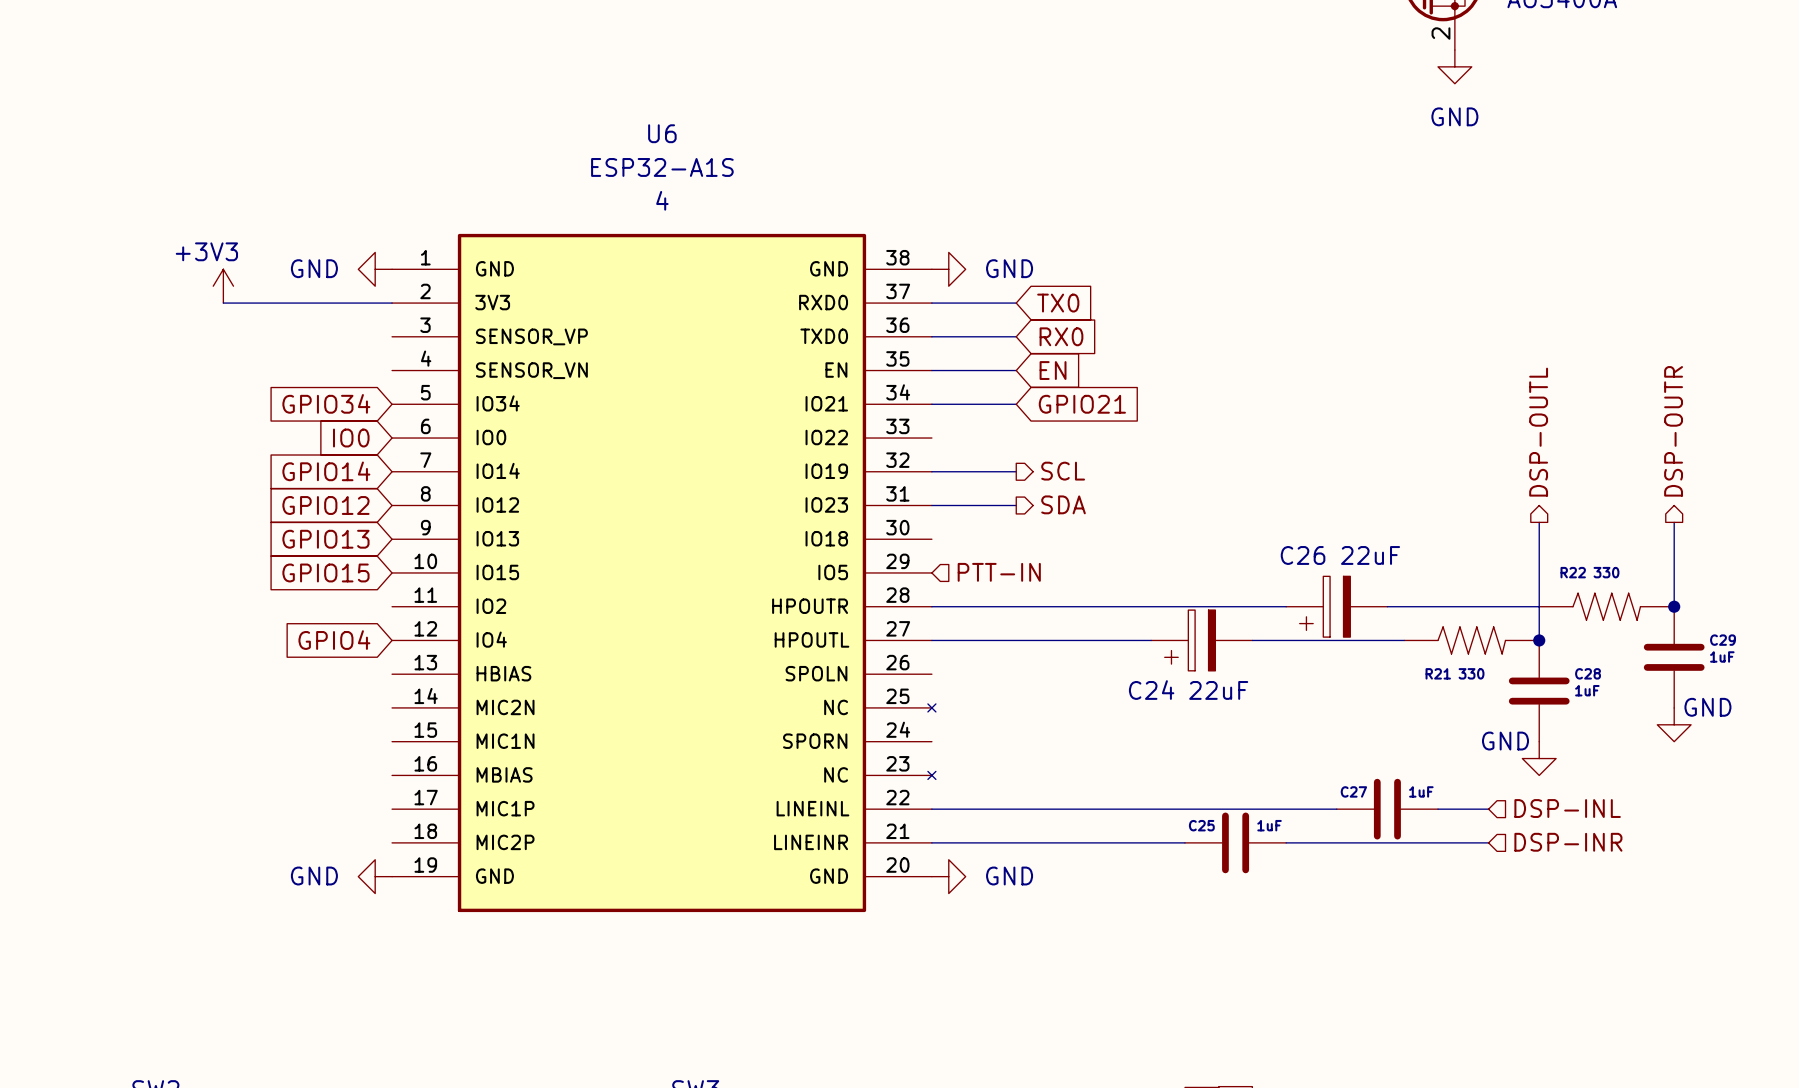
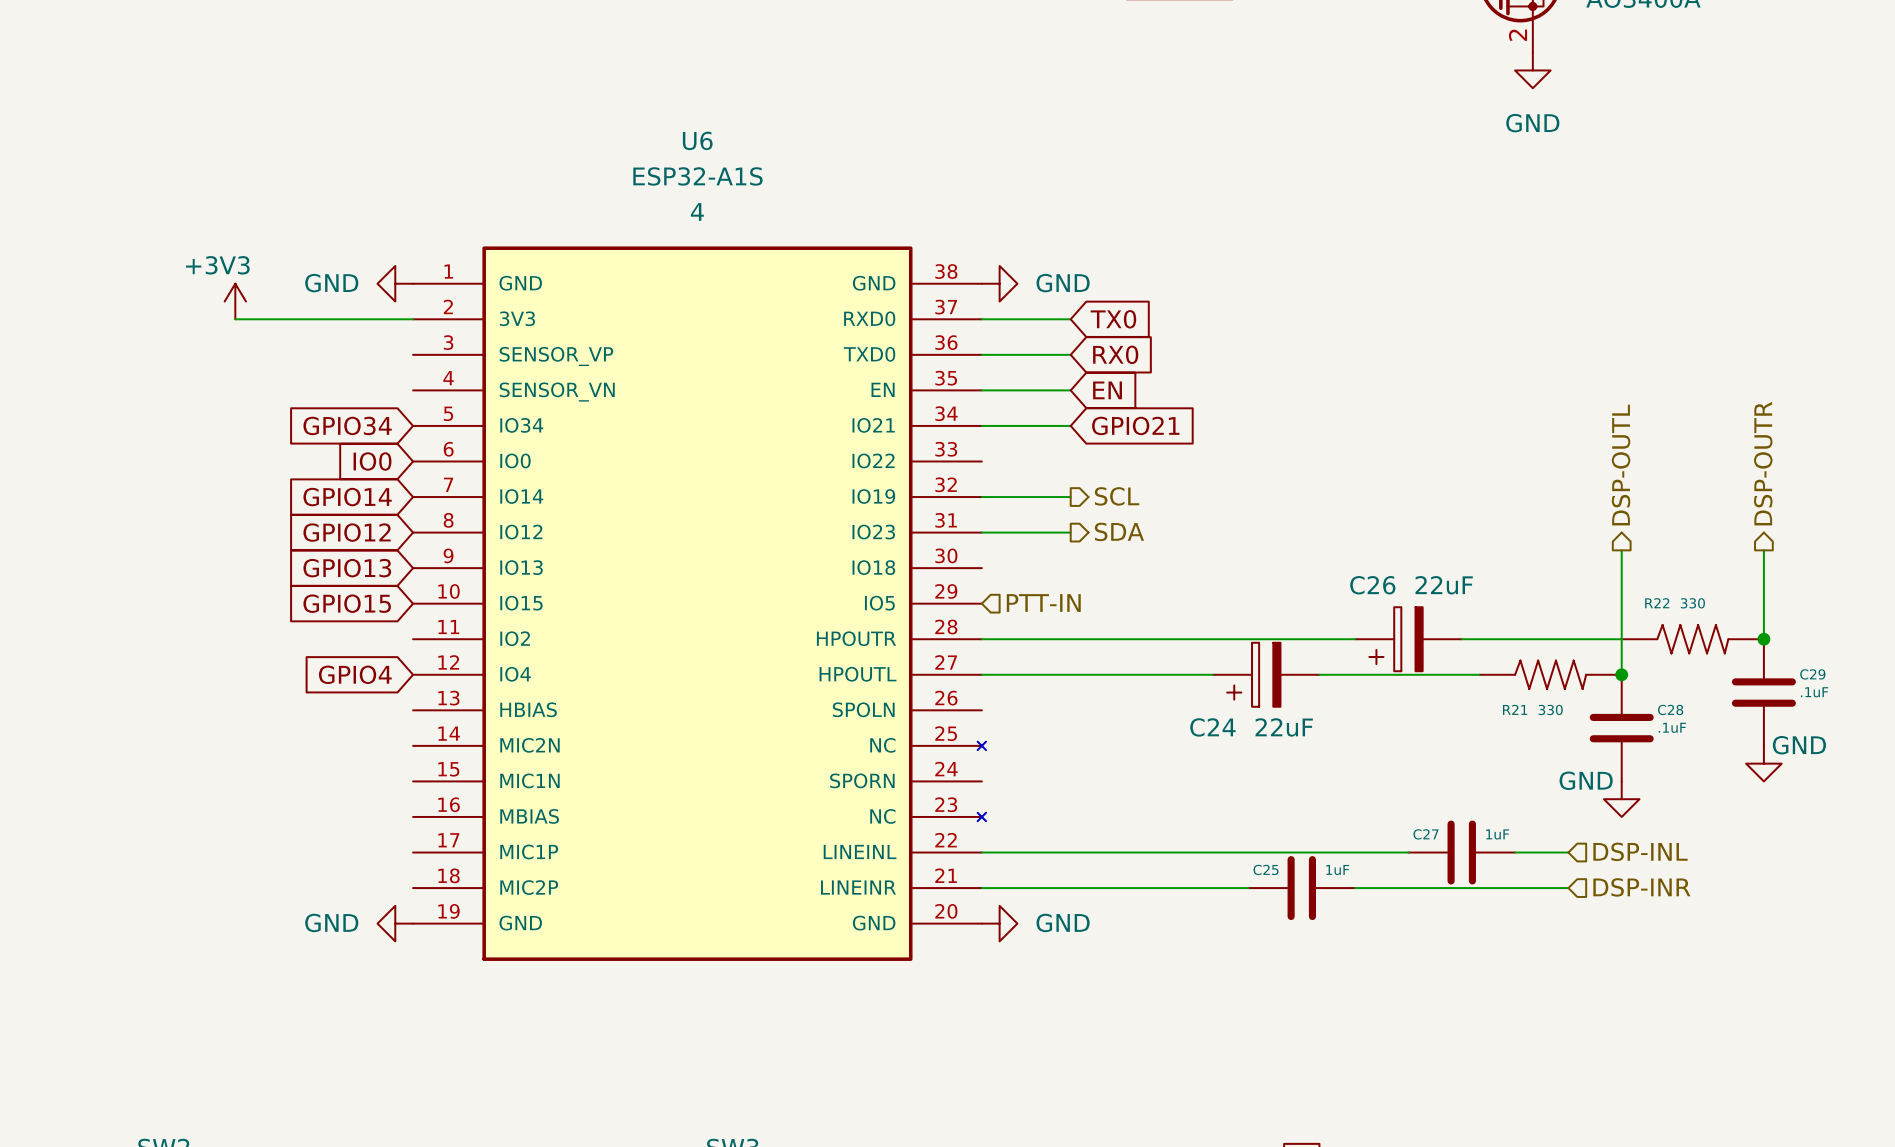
C29 value: 1uF (1722, 656) -> .1uF (1814, 692)
C28 value: 1uF (1587, 690) -> .1uF (1672, 727)

